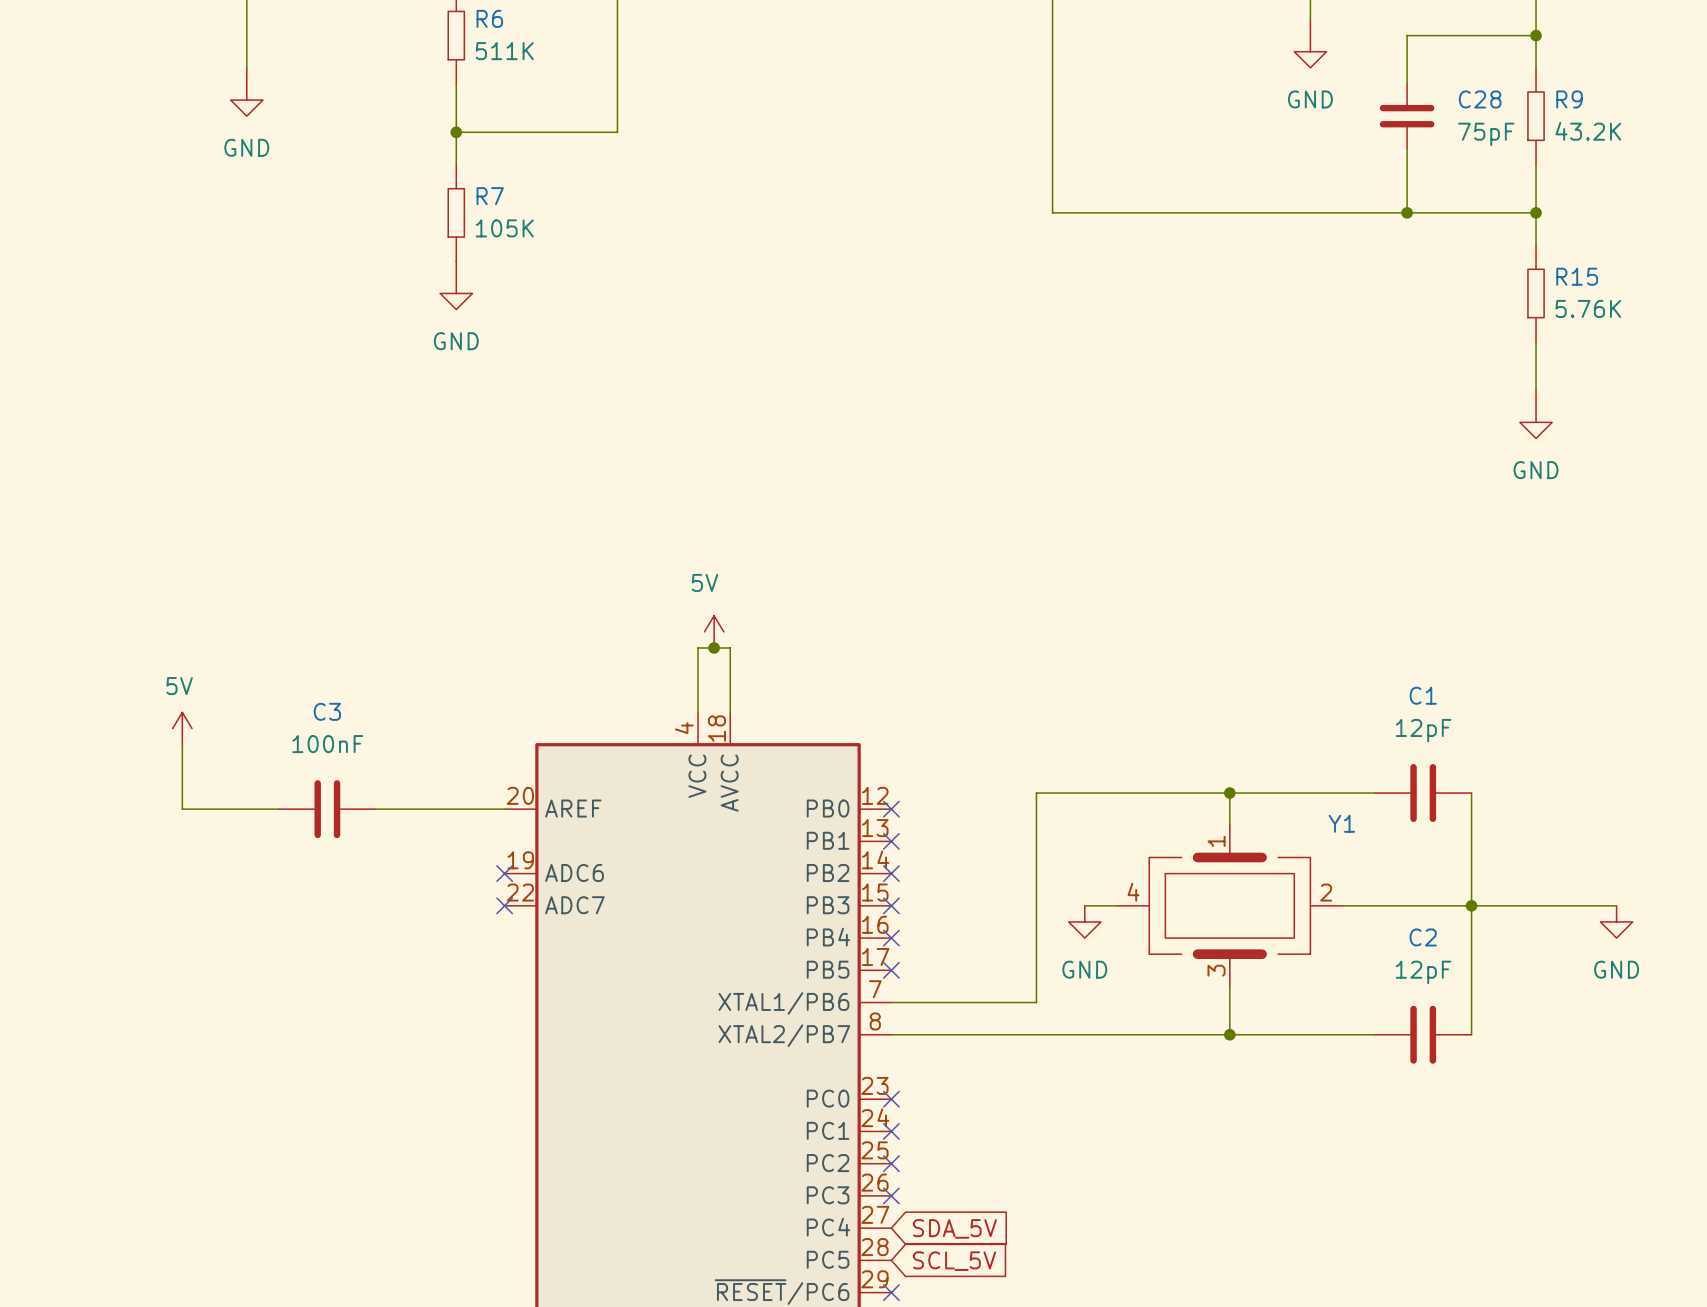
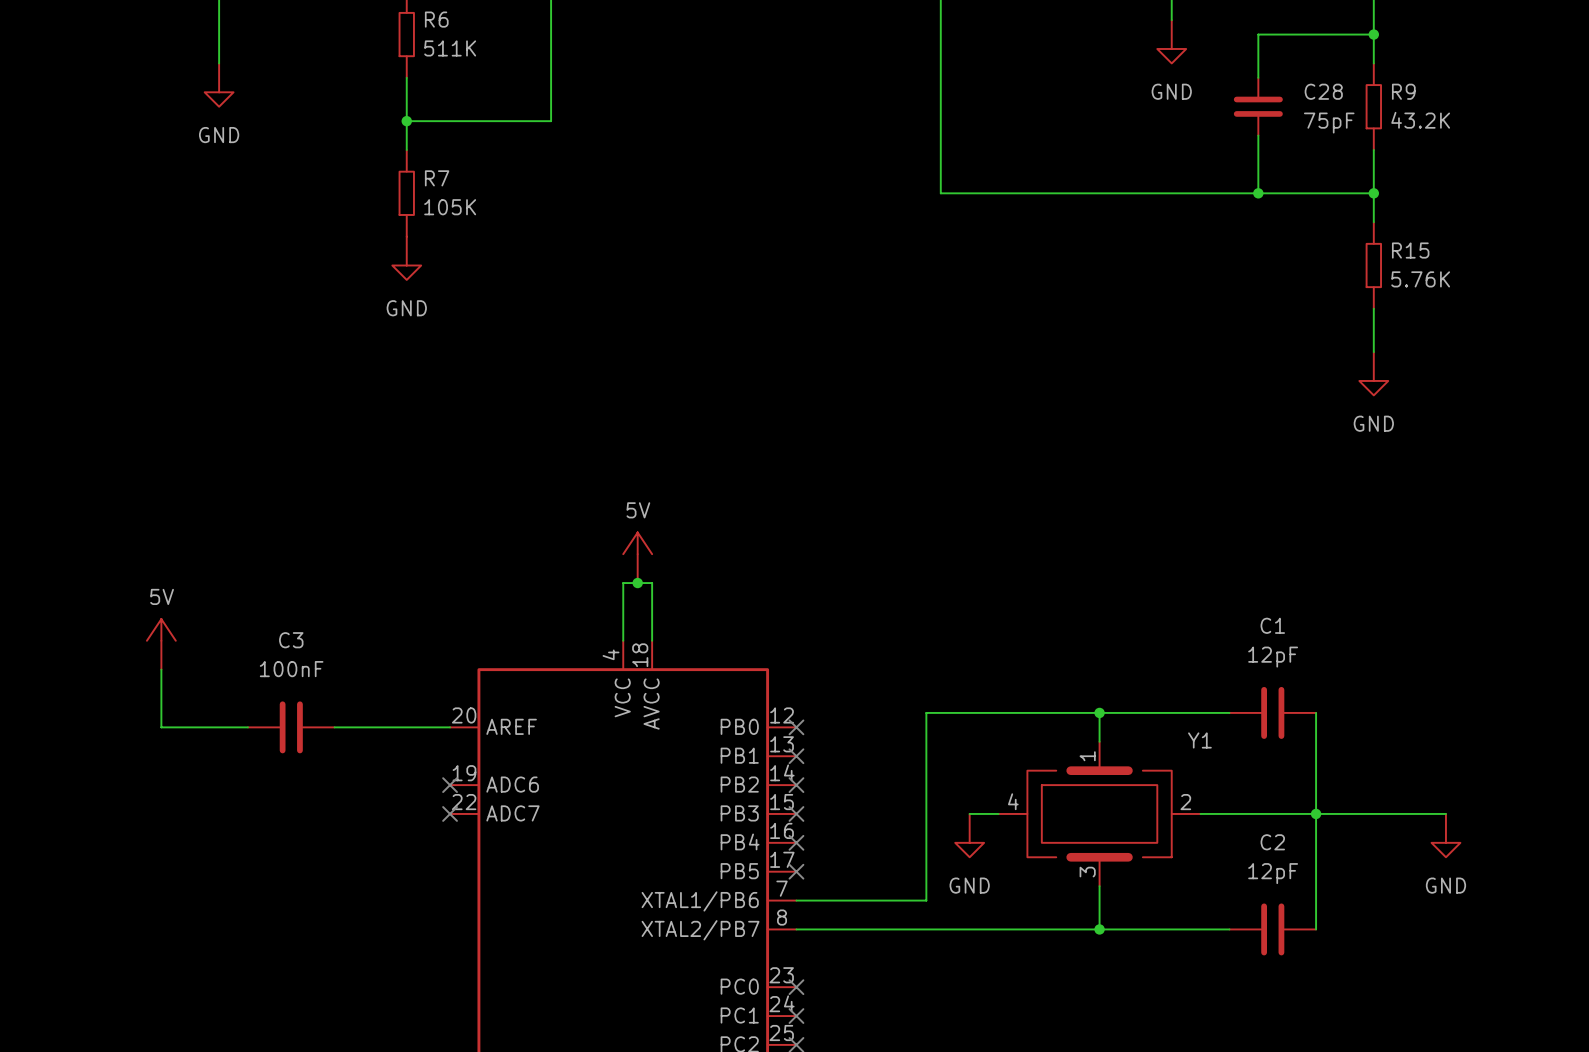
power symbol shape: [704, 615, 724, 648] -> [623, 532, 653, 584]
power symbol shape: [172, 712, 193, 745] -> [146, 619, 176, 670]
power symbol shape: [1068, 905, 1101, 939] -> [955, 813, 985, 858]
power symbol shape: [1600, 905, 1633, 939] -> [1431, 813, 1461, 858]

